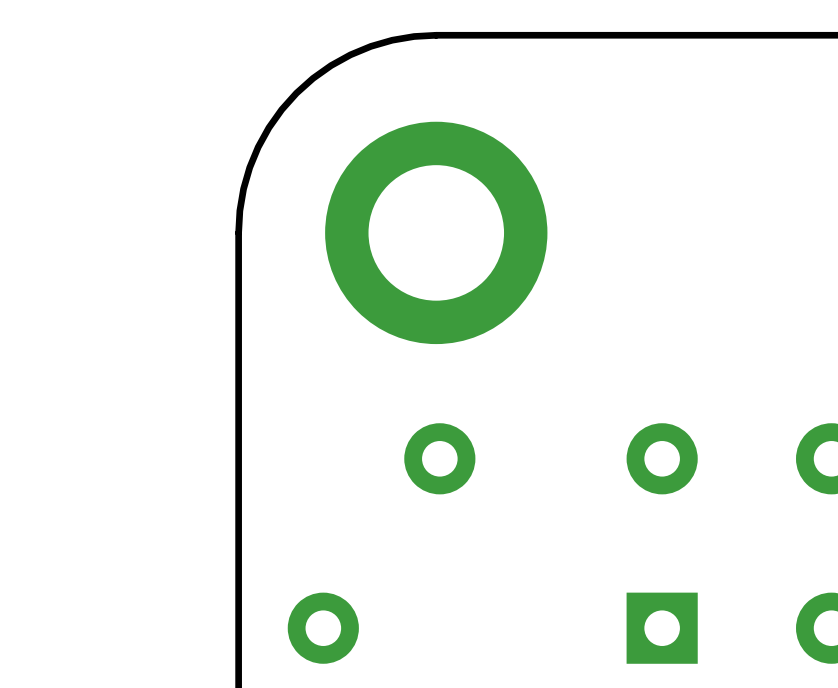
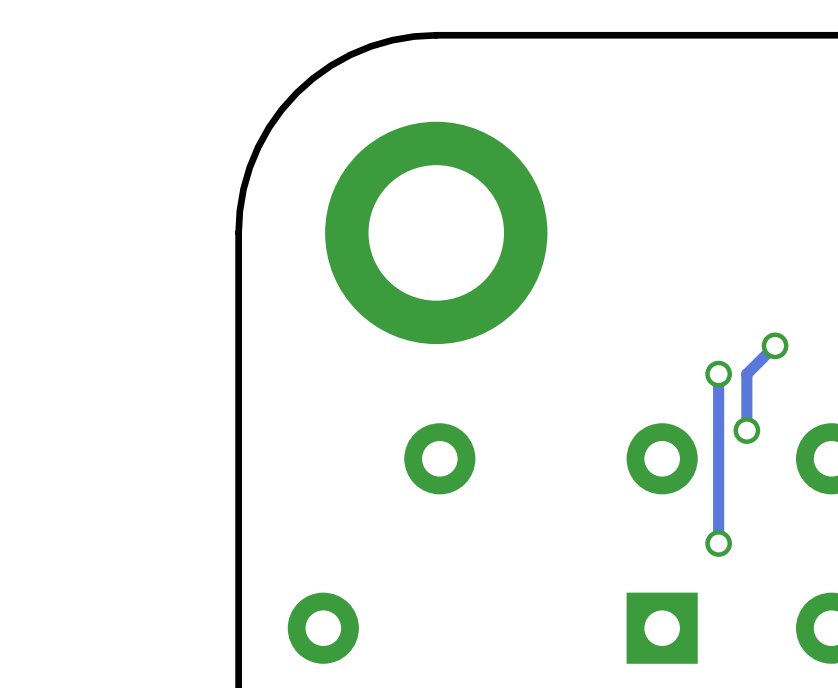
track: none -> (775, 345) (746, 374) (746, 430)
via: none -> (775, 345)
track: none -> (718, 374) (718, 543)
via: none -> (718, 374)
via: none -> (746, 430)
via: none -> (718, 543)

